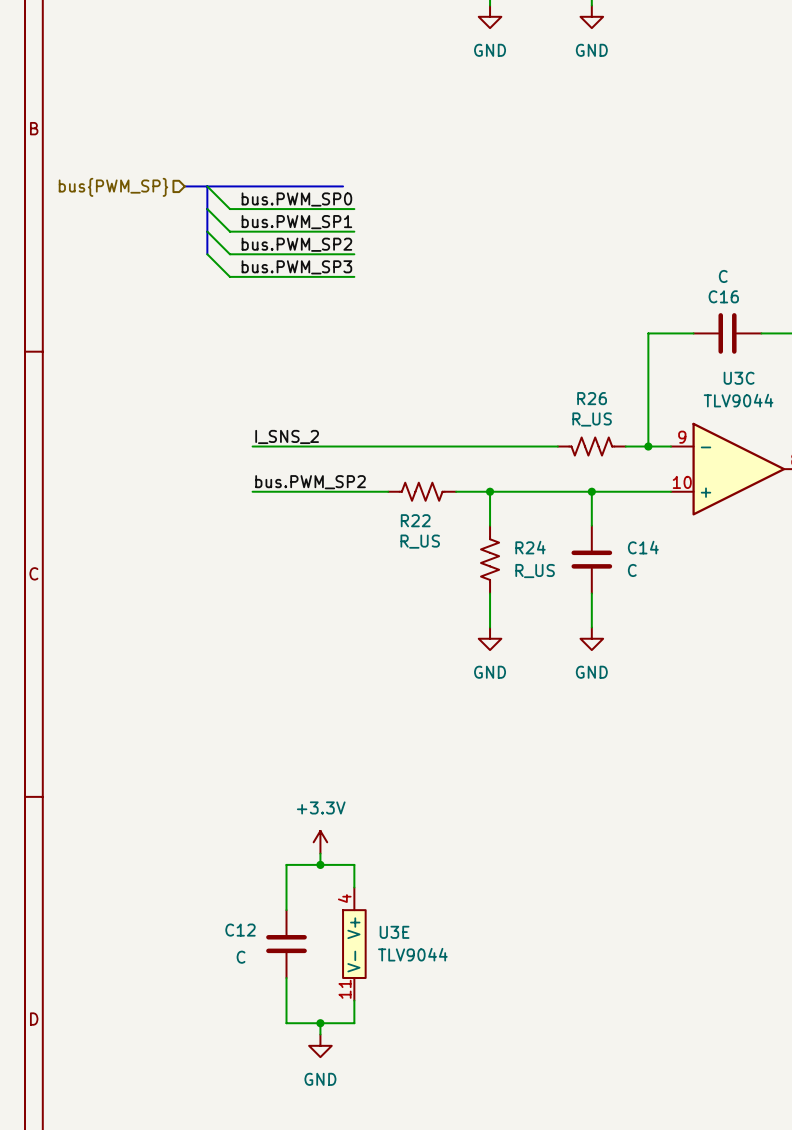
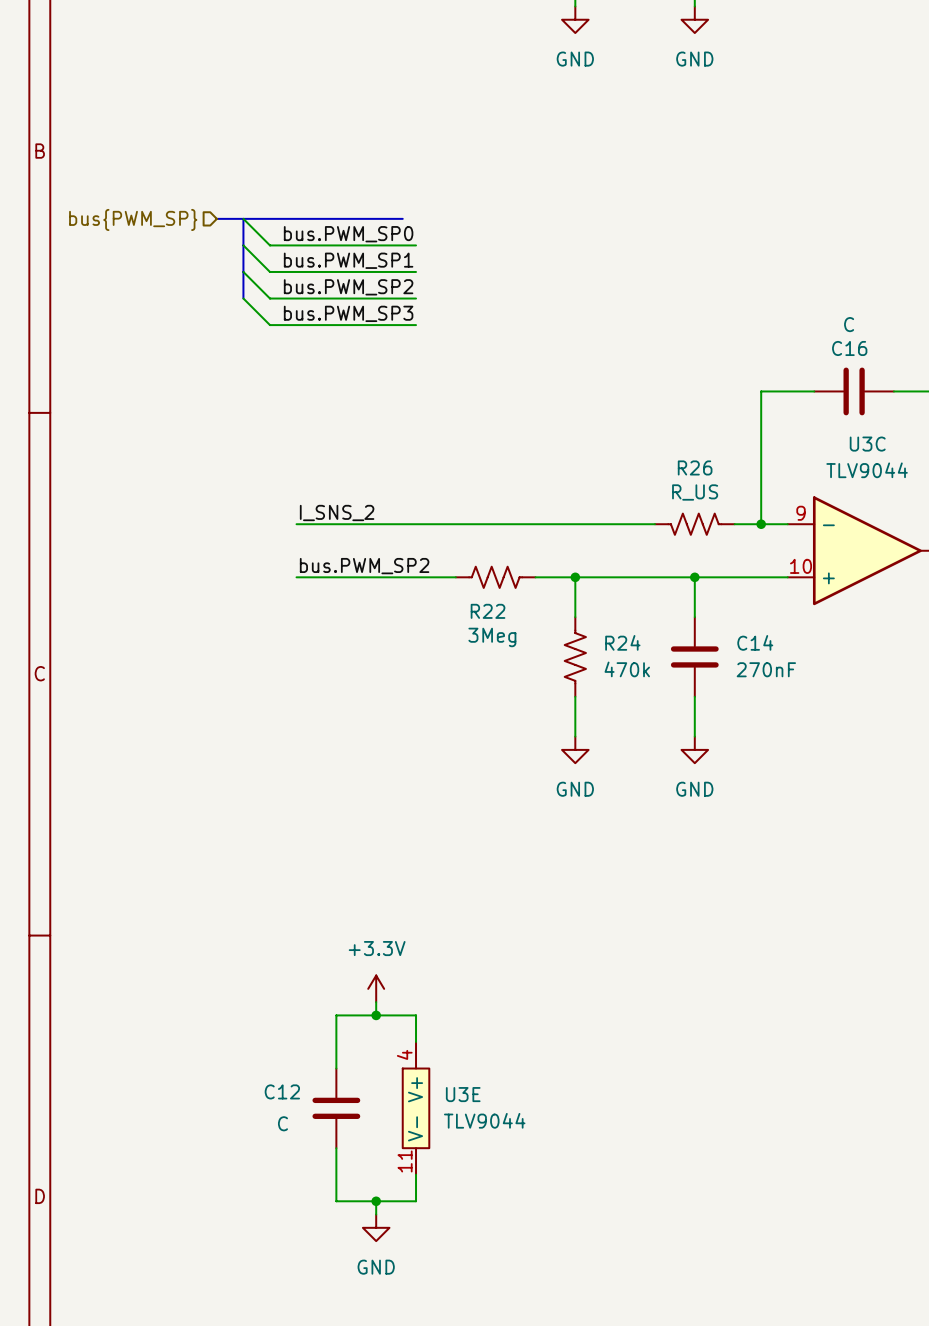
R22 value: R_US (420, 541) -> 3Meg (492, 637)
C14 value: C (632, 570) -> 270nF (766, 669)
R24 value: R_US (535, 571) -> 470k (627, 669)

